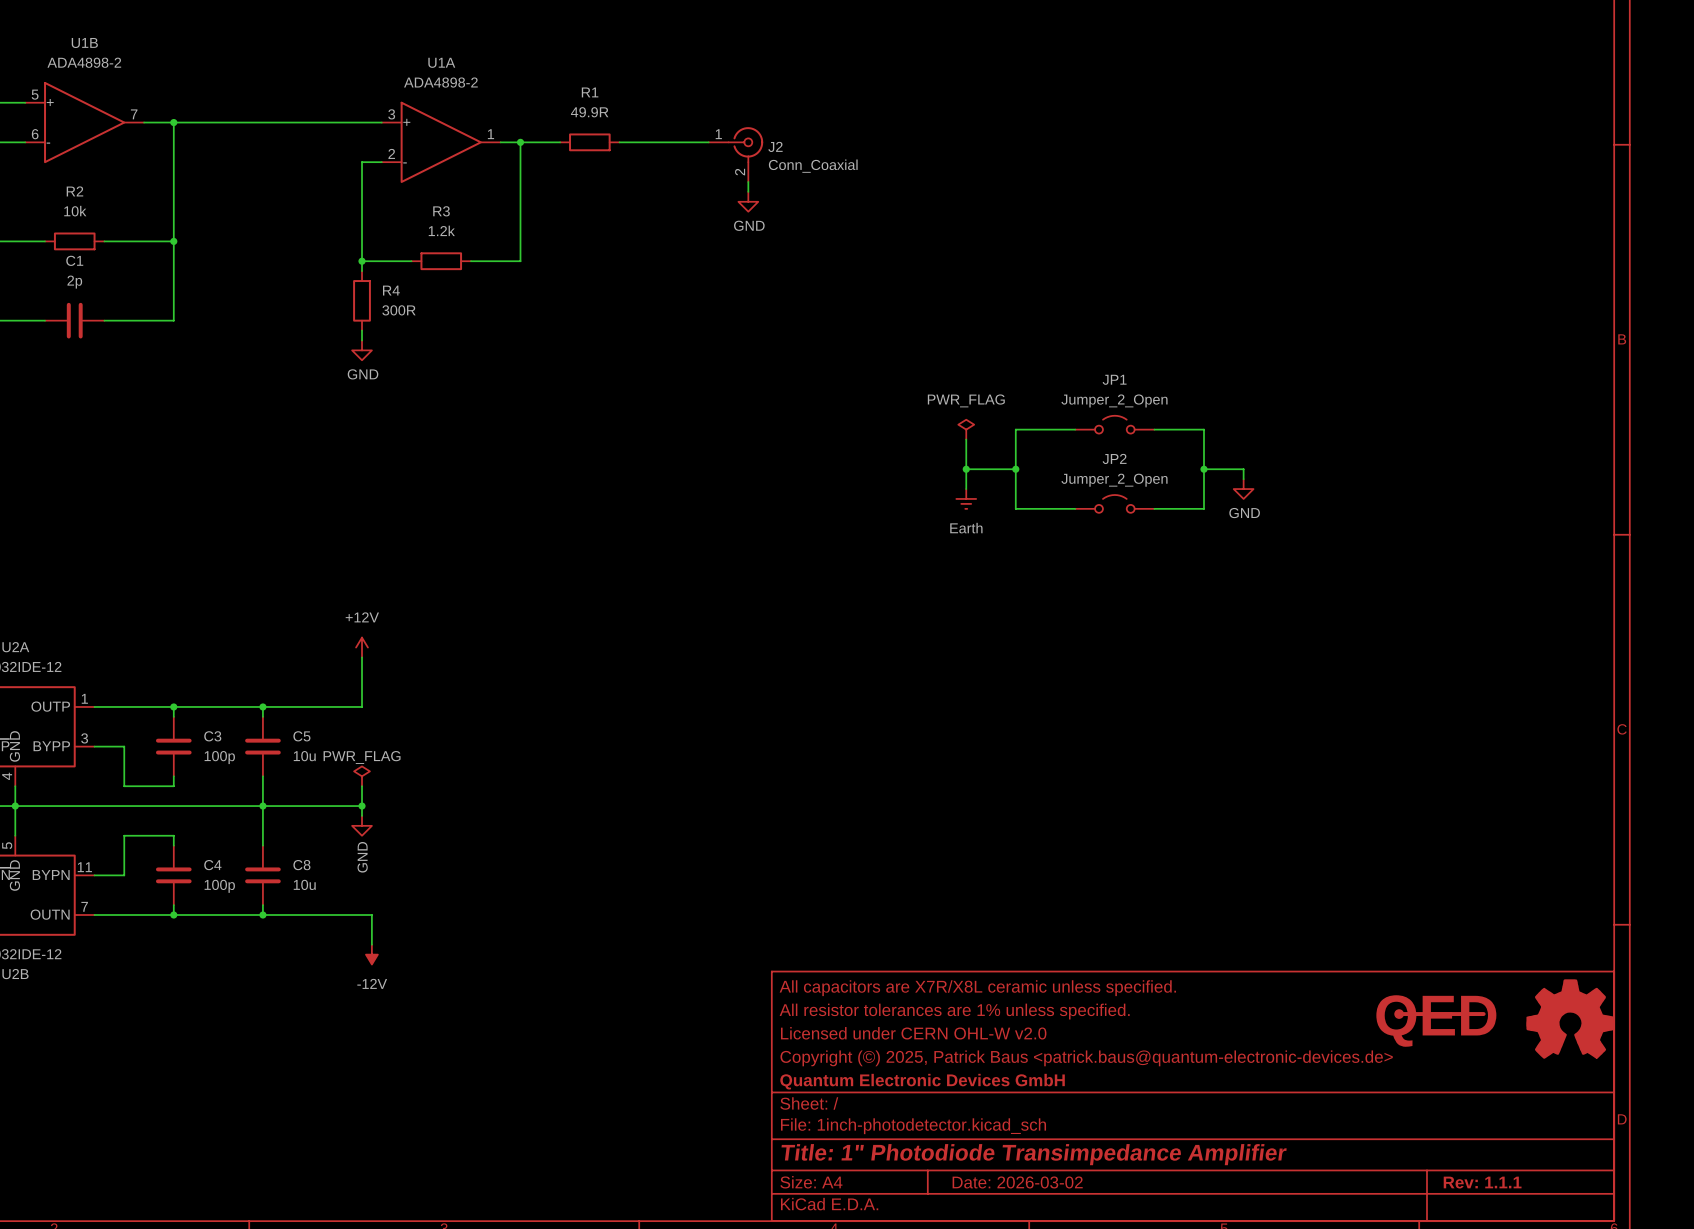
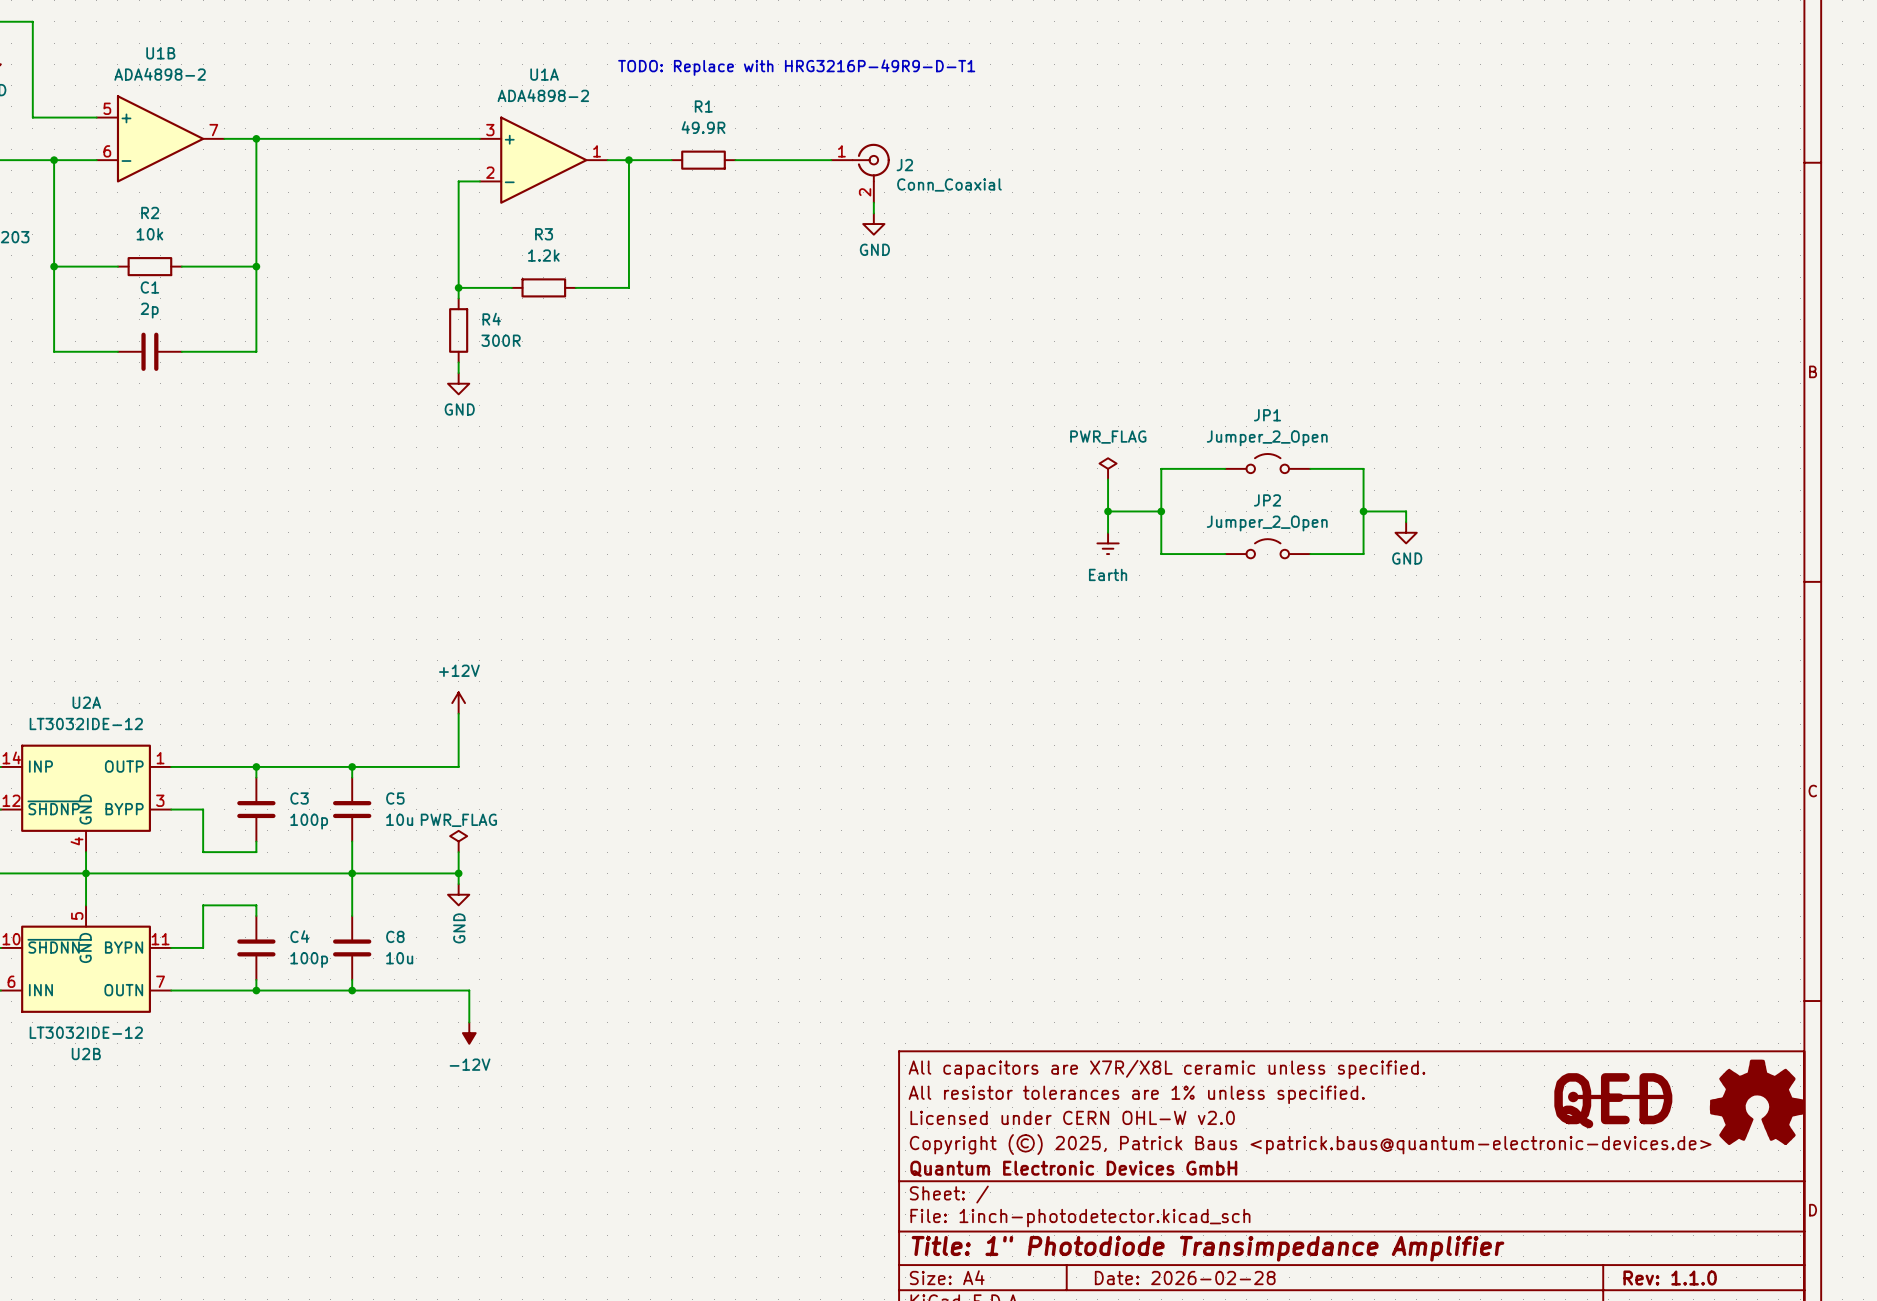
text: none -> TODO: Replace with HRG3216P-49R9-D-T1 (796, 67)
title block: Date: 2026-03-02 (1017, 1182) -> Date: 2026-02-28 (1185, 1278)
title block: Rev: 1.1.1 (1482, 1182) -> Rev: 1.1.0 (1670, 1278)

